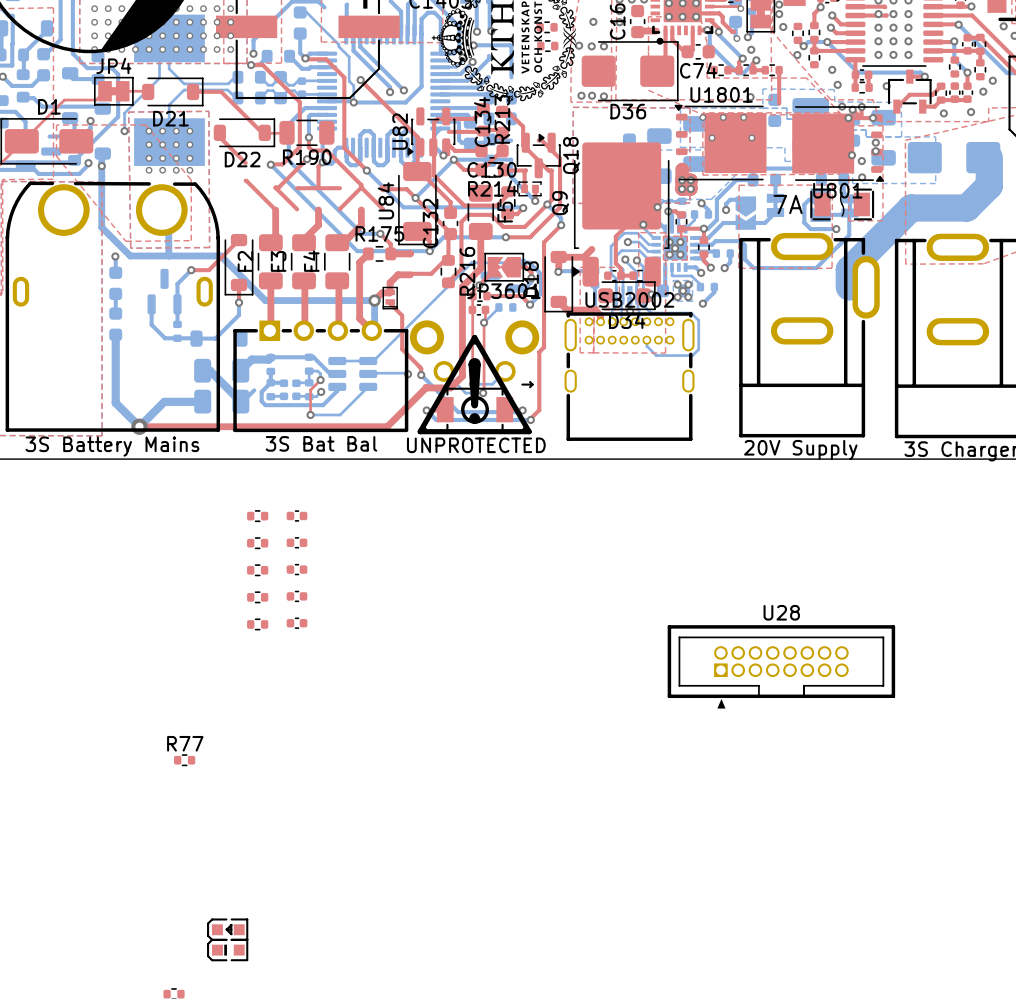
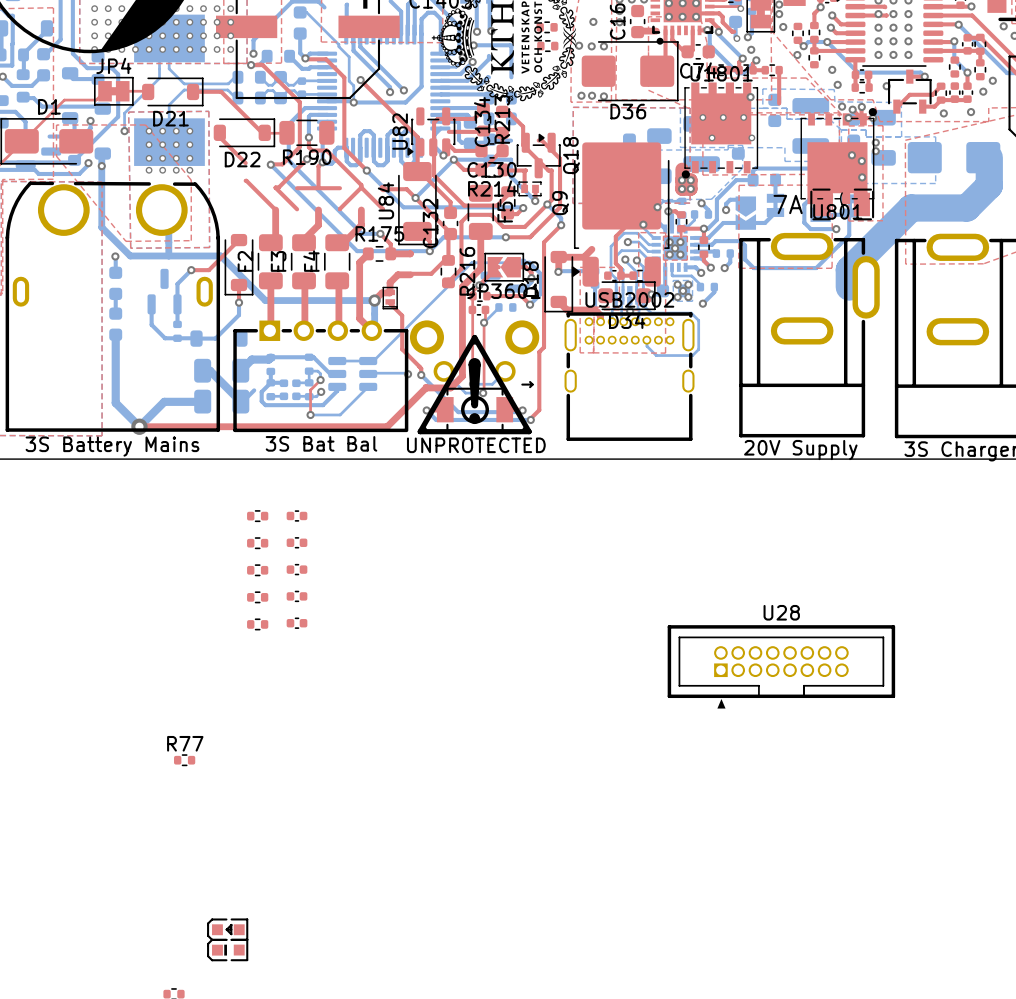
U1801 footprint: [674, 104, 767, 181] -> [681, 82, 759, 179]
U801 footprint: [792, 106, 885, 182] -> [800, 108, 877, 205]

